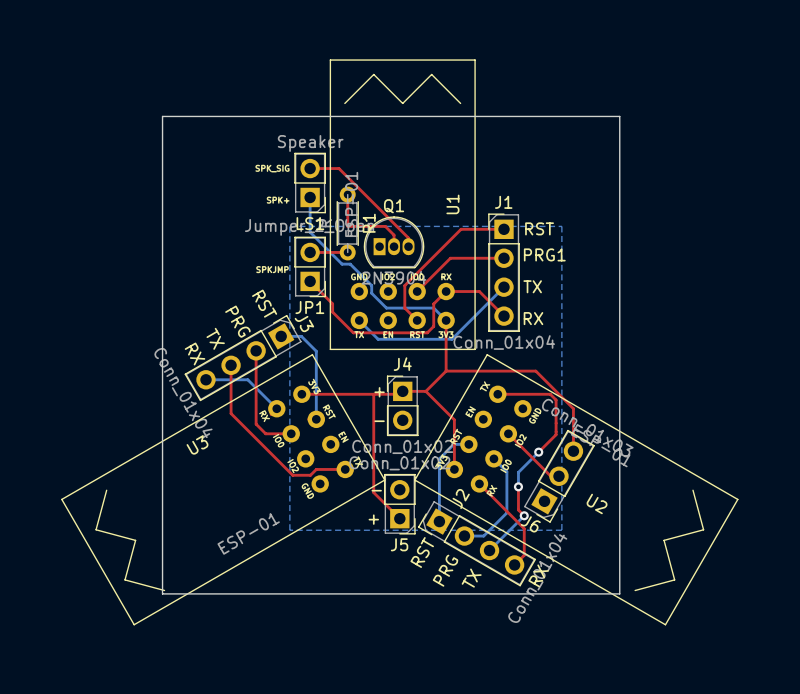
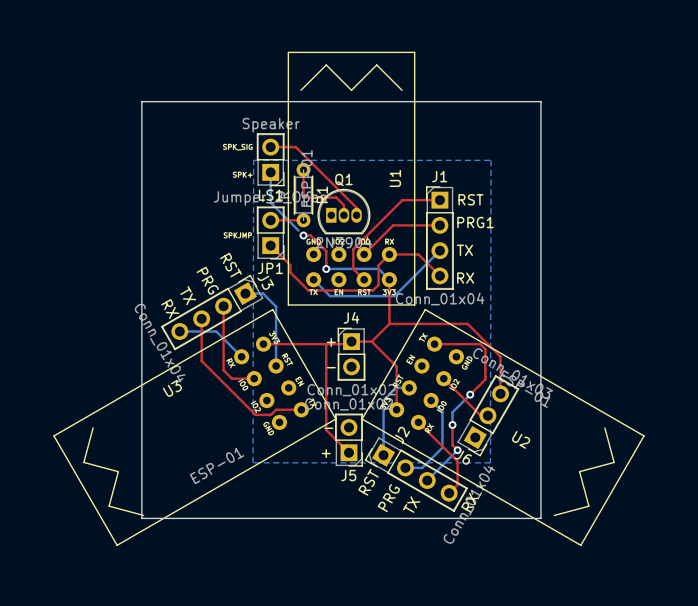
bottom track: (342, 264) (350, 264) (371, 285) (371, 293) (386, 308) -> (326, 268) (337, 268)
top track: none -> (303, 235) (310, 235) (326, 251) (326, 268)
via: none -> (303, 235)
via: none -> (326, 268)
bottom zone outline: (289, 530) (289, 226) (561, 226) (561, 530) -> (253, 462) (253, 160) (491, 160) (490, 462)

